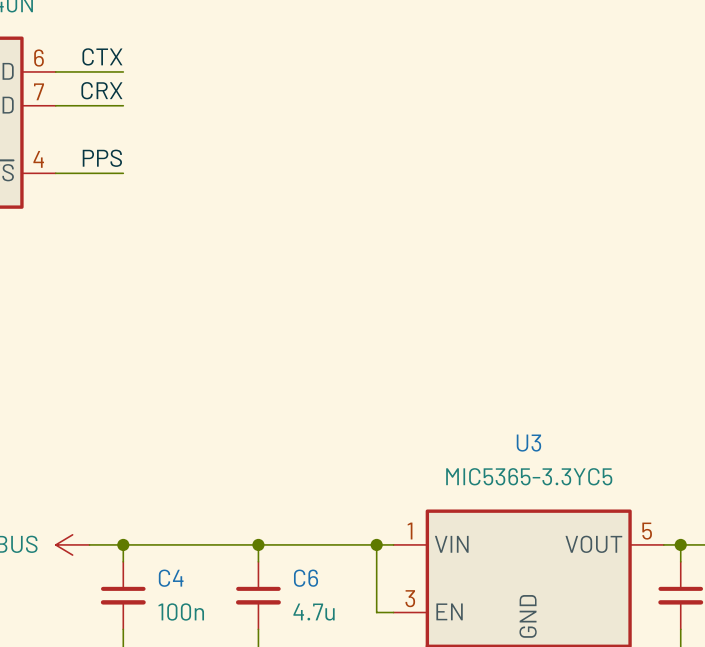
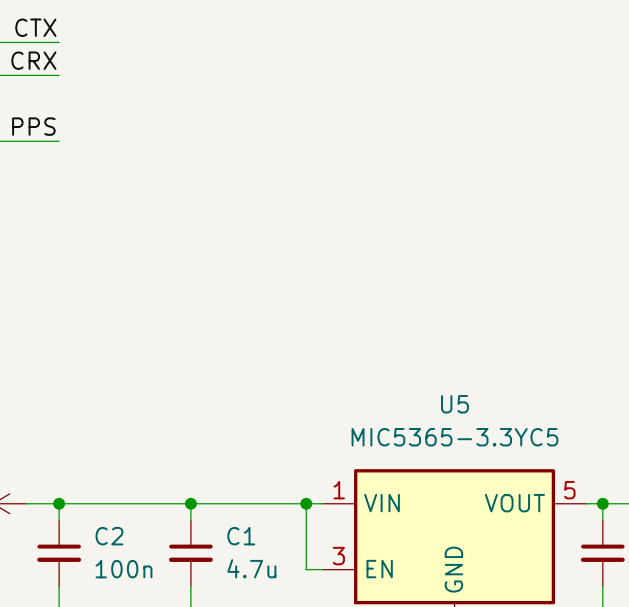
U3 name: U3 (528, 443) -> U5 (454, 404)
C4 name: C4 (171, 578) -> C2 (109, 536)
C6 name: C6 (306, 578) -> C1 (241, 536)

